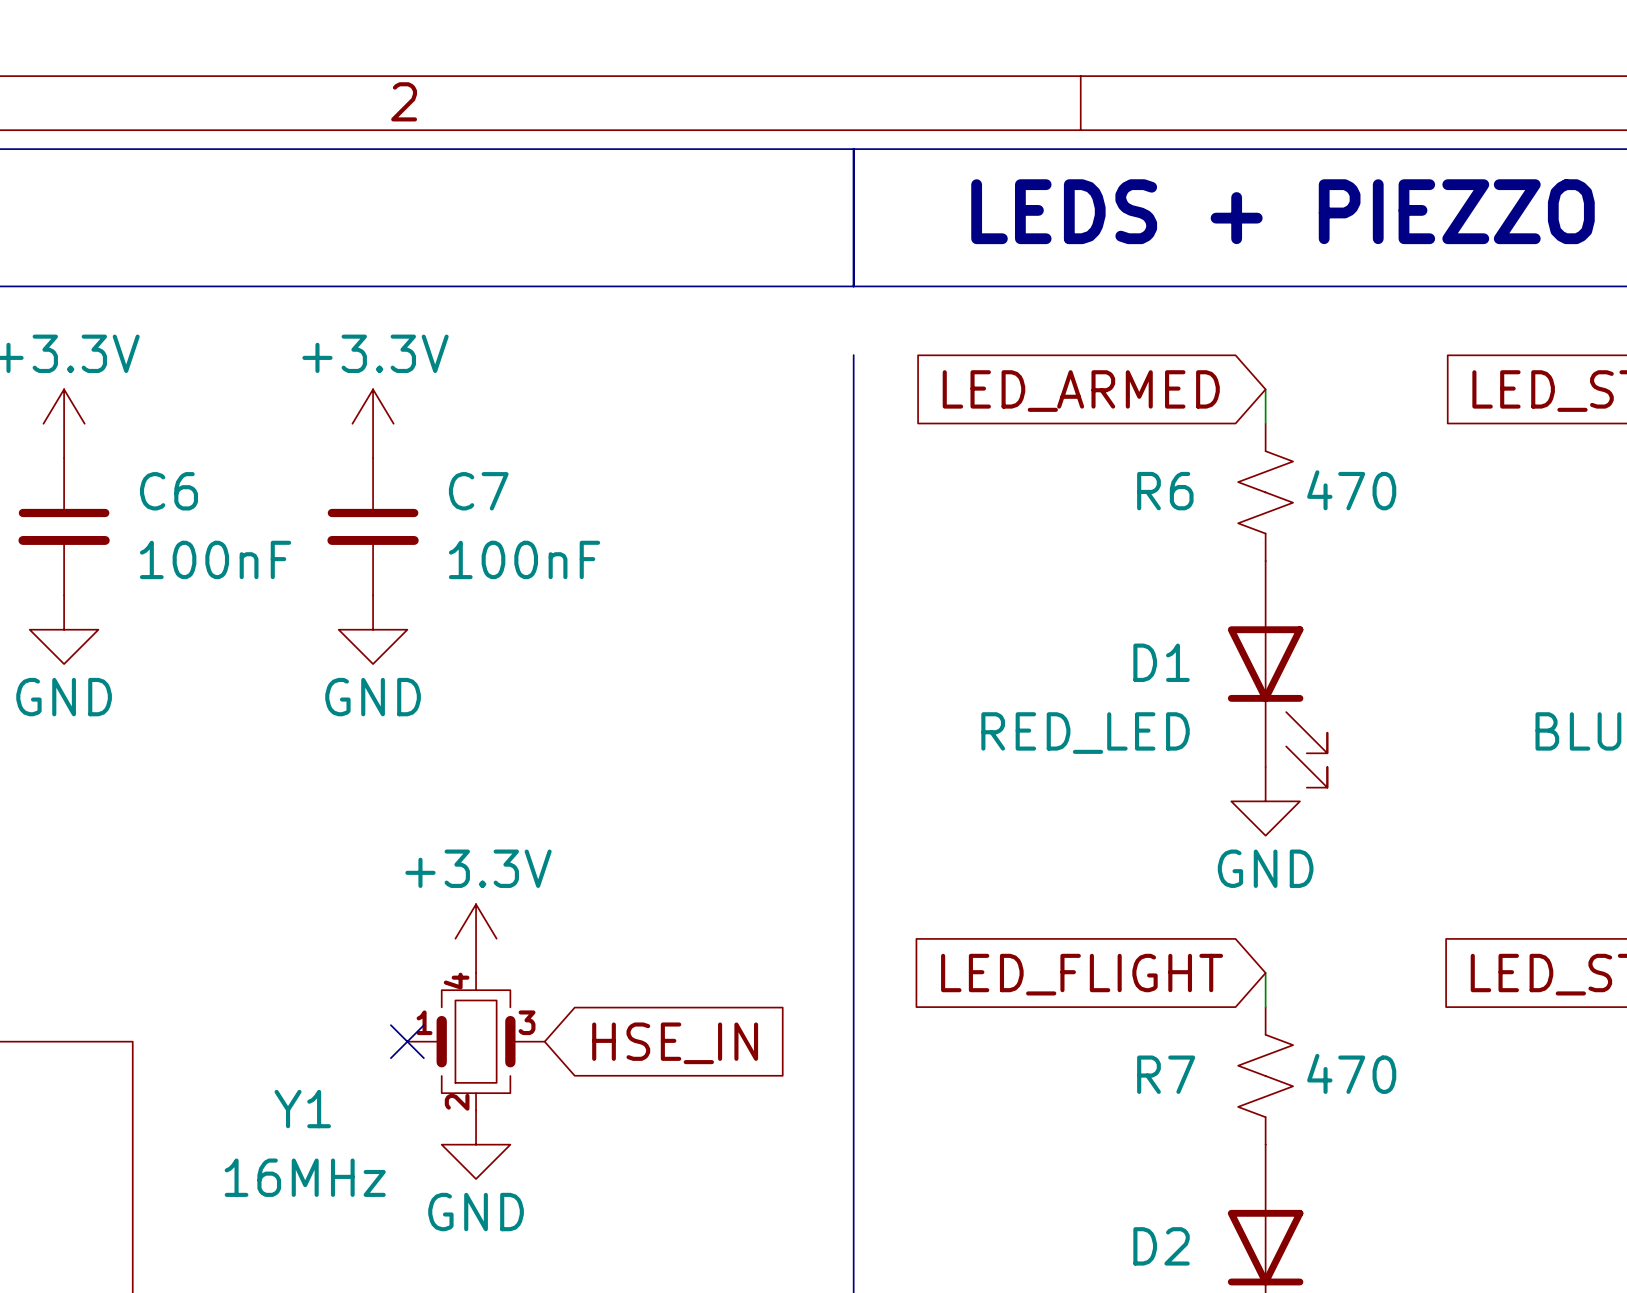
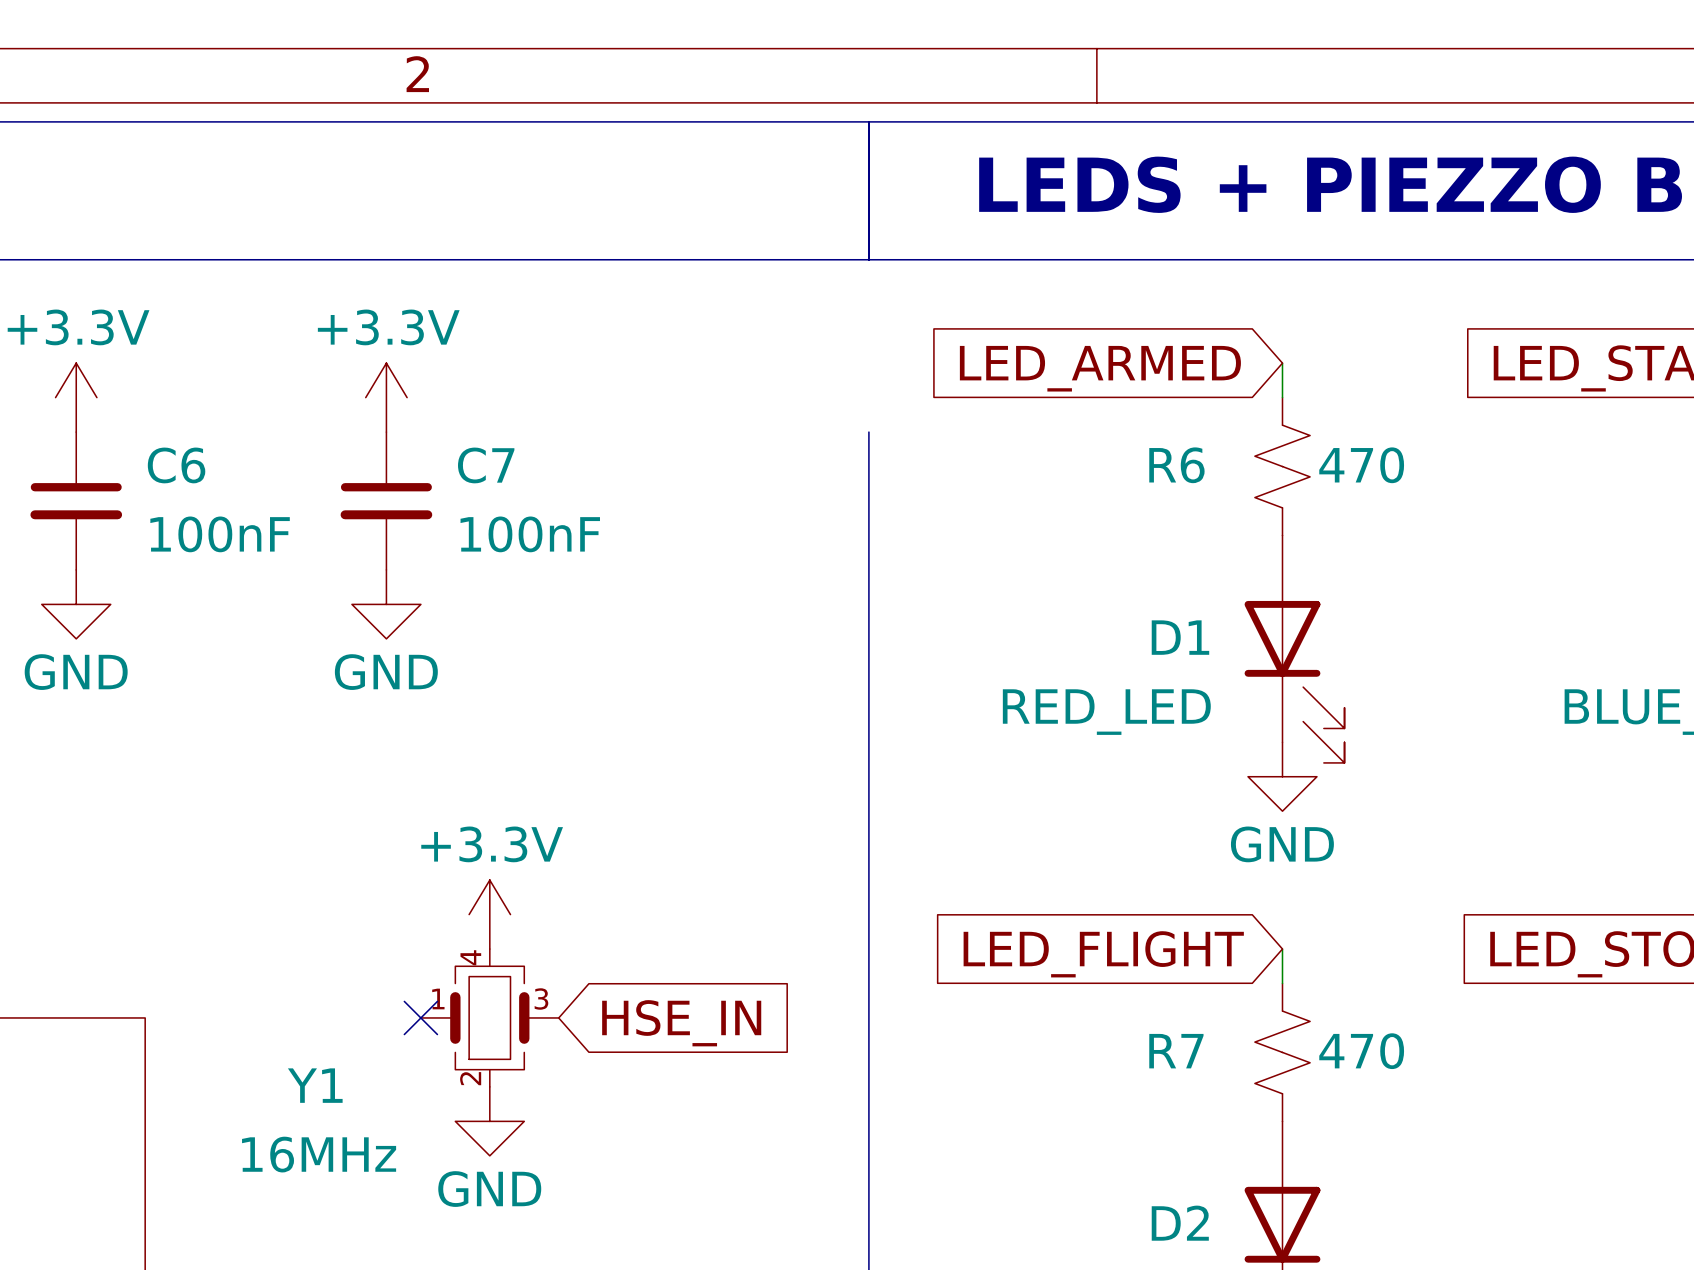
line: (853, 355) (853, 458) -> none

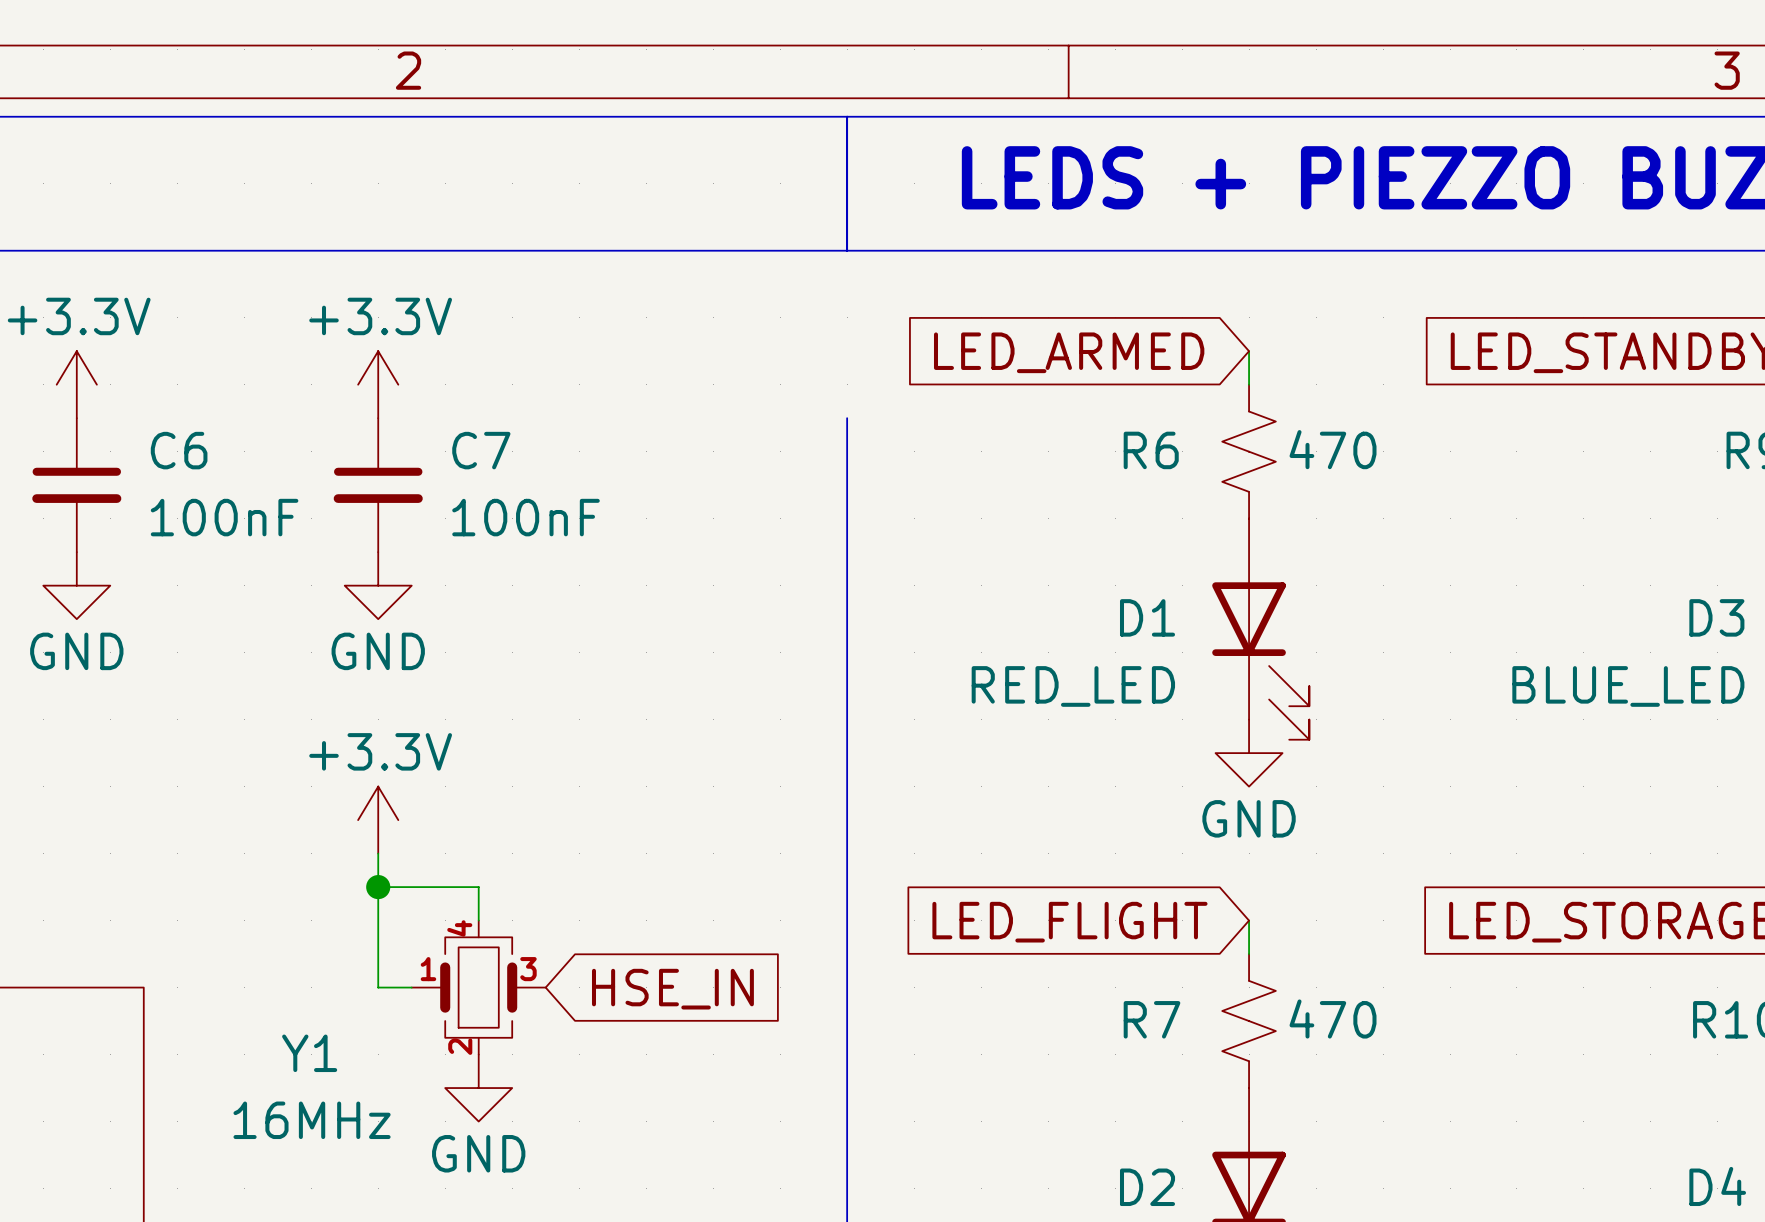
wire: none -> (378, 853) (378, 987) (411, 987)
wire: none -> (378, 887) (478, 887) (478, 920)
junction: none -> (378, 887)
power symbol position: +3.3V (489, 914) -> +3.3V (378, 820)
no-connect mark: (420, 1017) -> none

